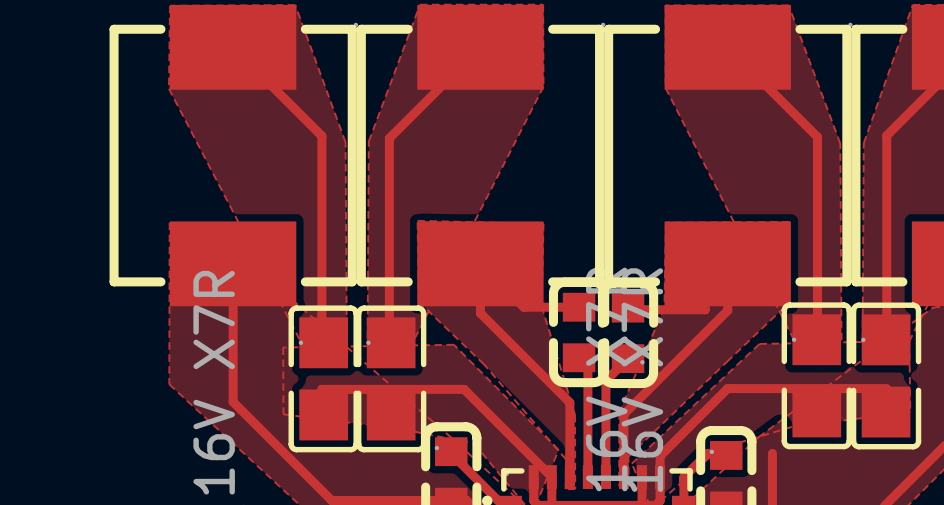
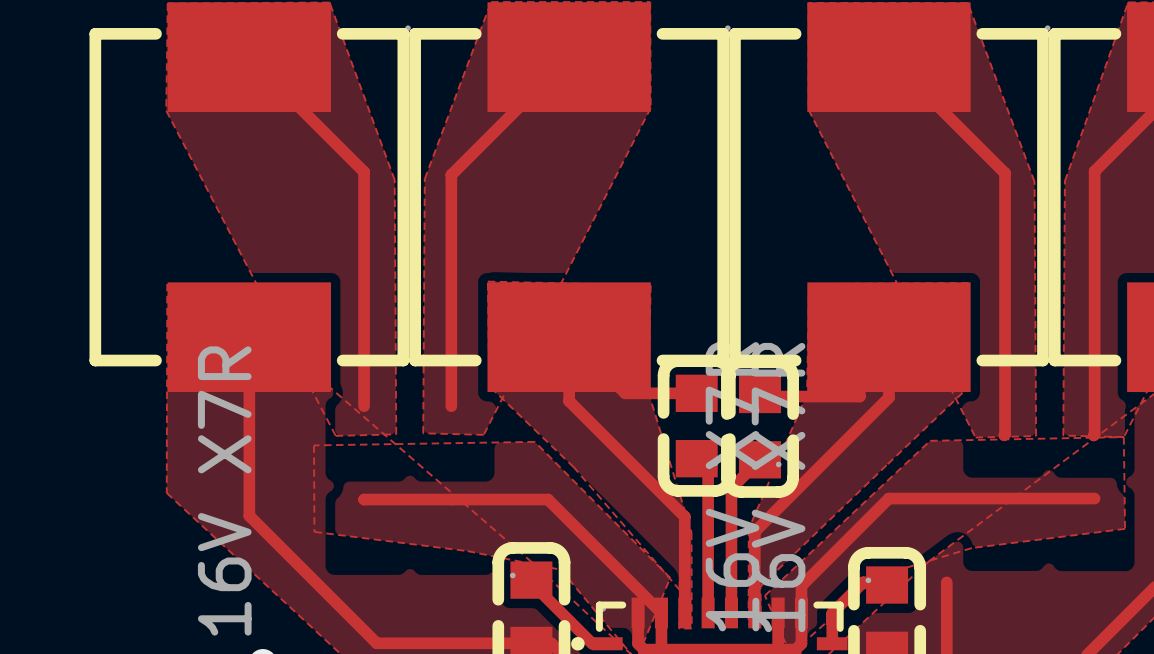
part: (816, 375) -> none
part: (886, 375) -> none
part: (323, 378) -> none
part: (391, 378) -> none

